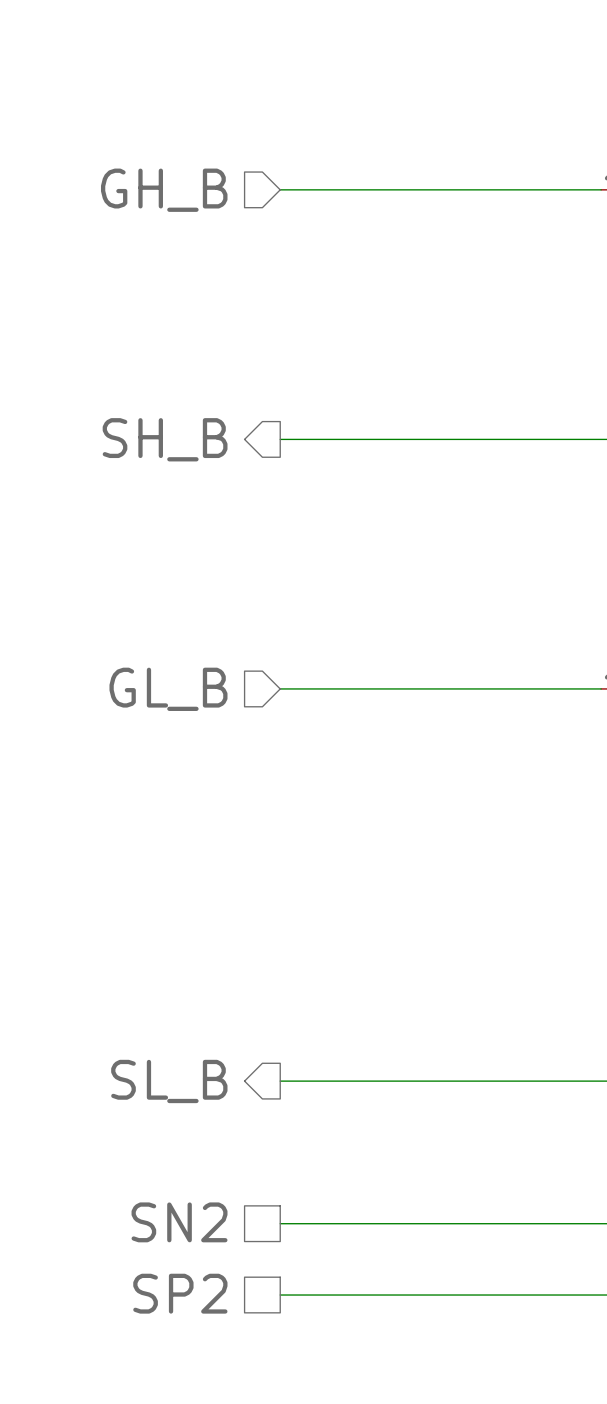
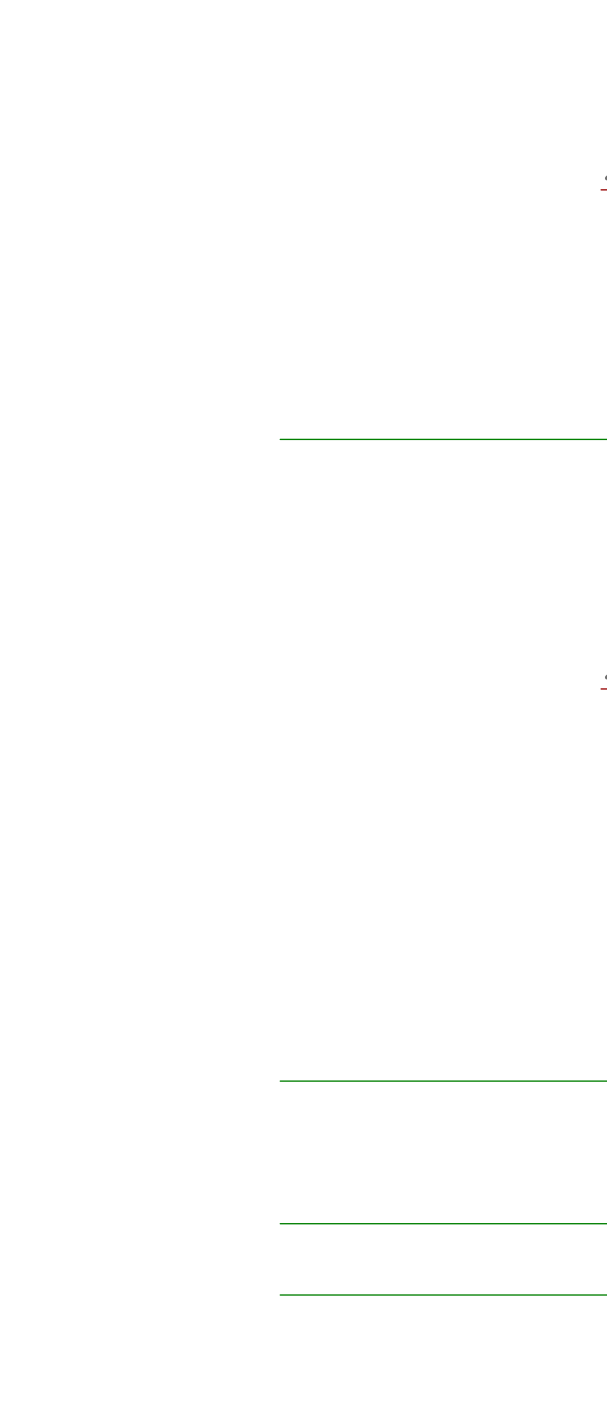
wire: (280, 189) (601, 189) -> none
hierarchical label: GH_B (164, 190) -> none
hierarchical label: SH_B (165, 439) -> none
wire: (280, 688) (601, 688) -> none
hierarchical label: GL_B (168, 689) -> none
hierarchical label: SL_B (169, 1081) -> none
hierarchical label: SN2 (179, 1222) -> none
hierarchical label: SP2 (180, 1293) -> none

